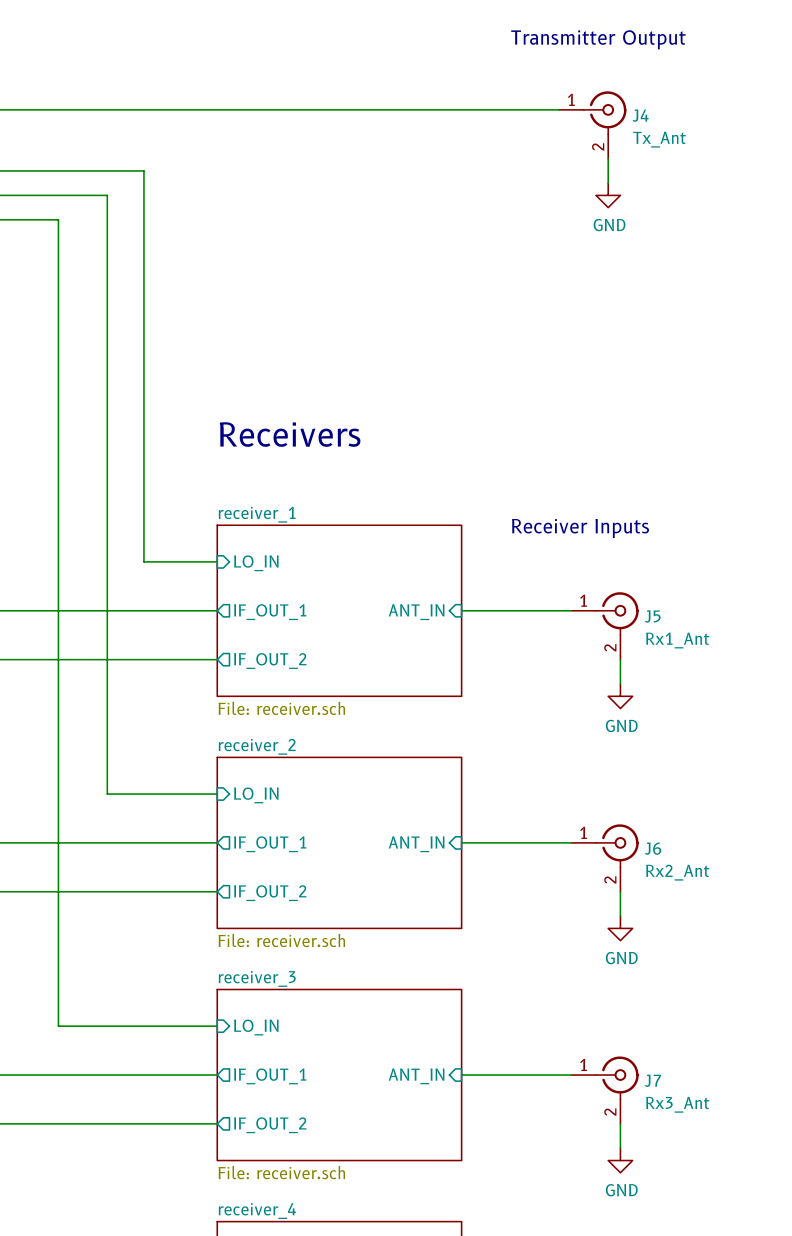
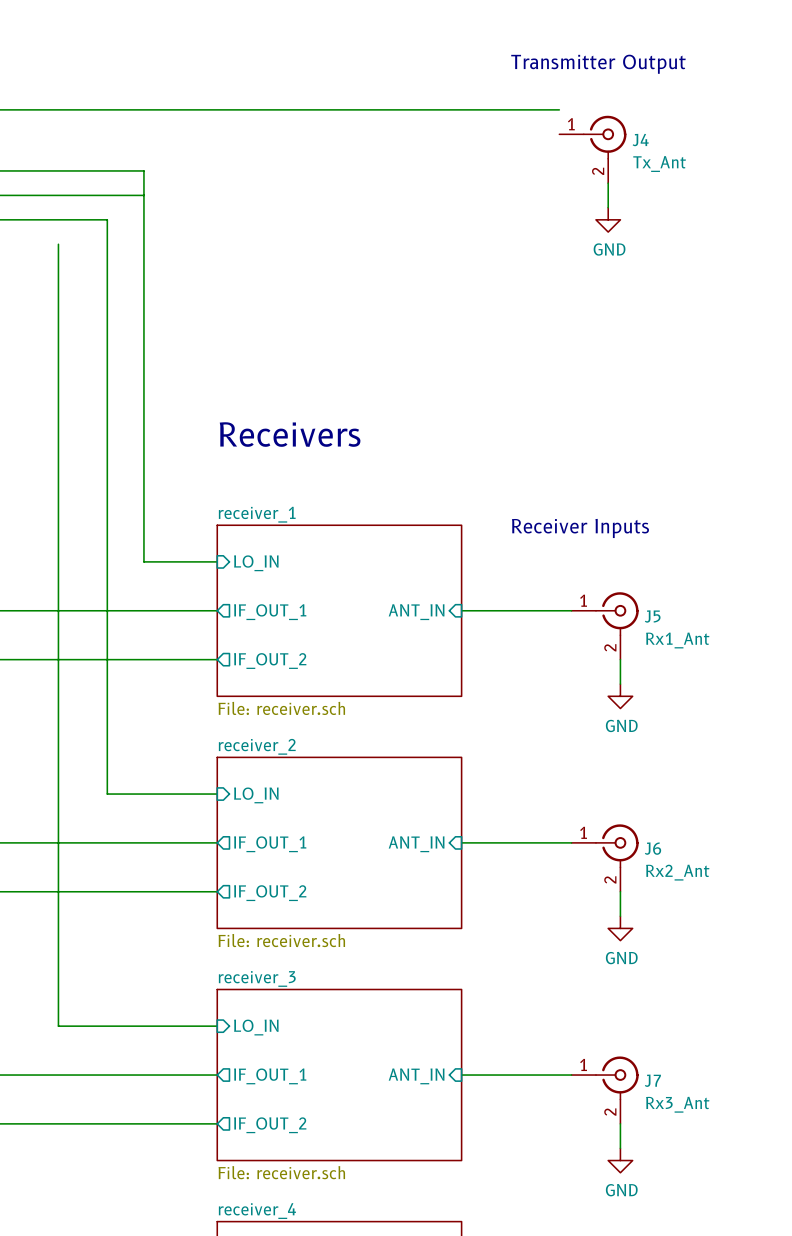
text position: Transmitter Output (598, 39) -> Transmitter Output (598, 64)
J4 position: (592, 125) -> (592, 149)
wire: (107, 195) (107, 219) -> (107, 195) (143, 195)
power symbol position: GND (608, 195) -> GND (608, 219)
wire: (58, 219) (58, 244) -> (58, 219) (107, 219)

